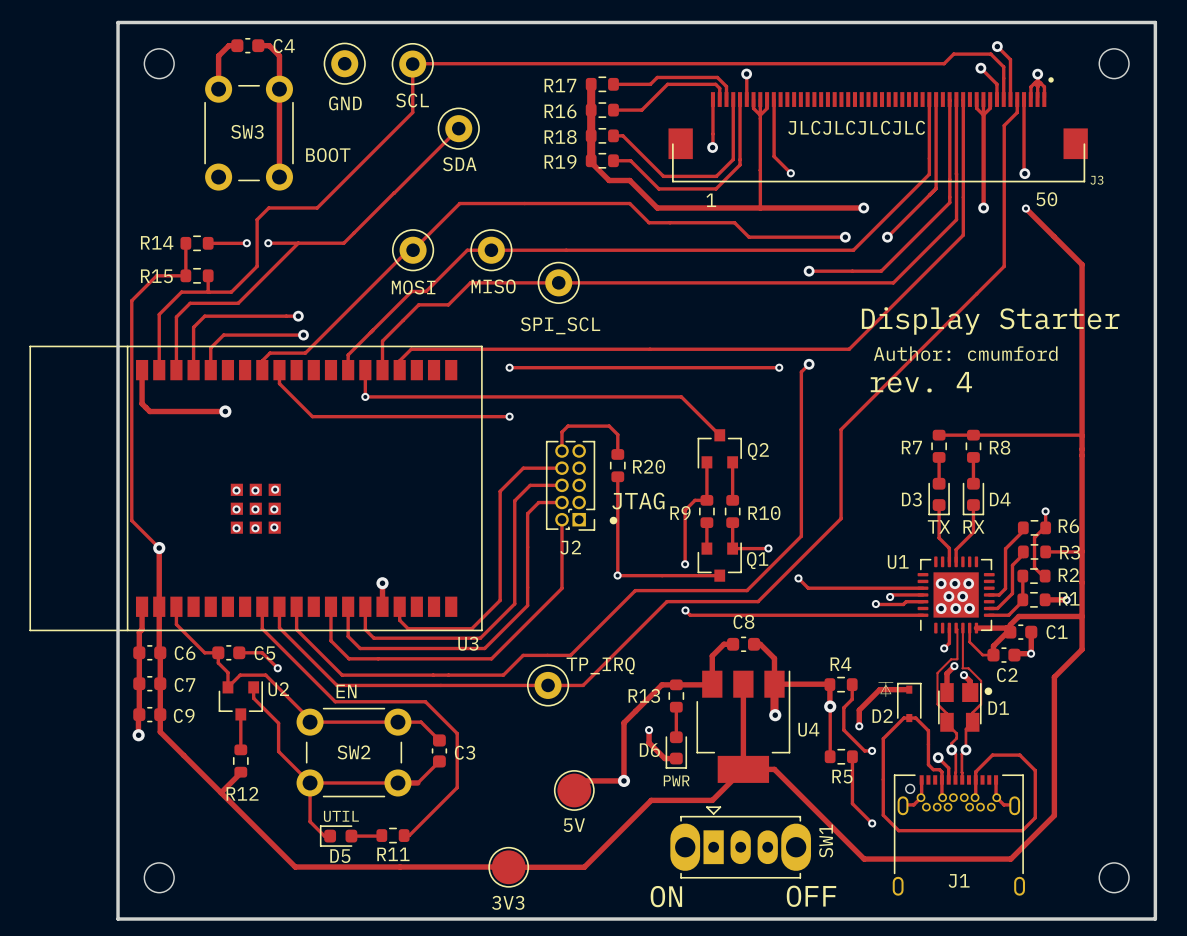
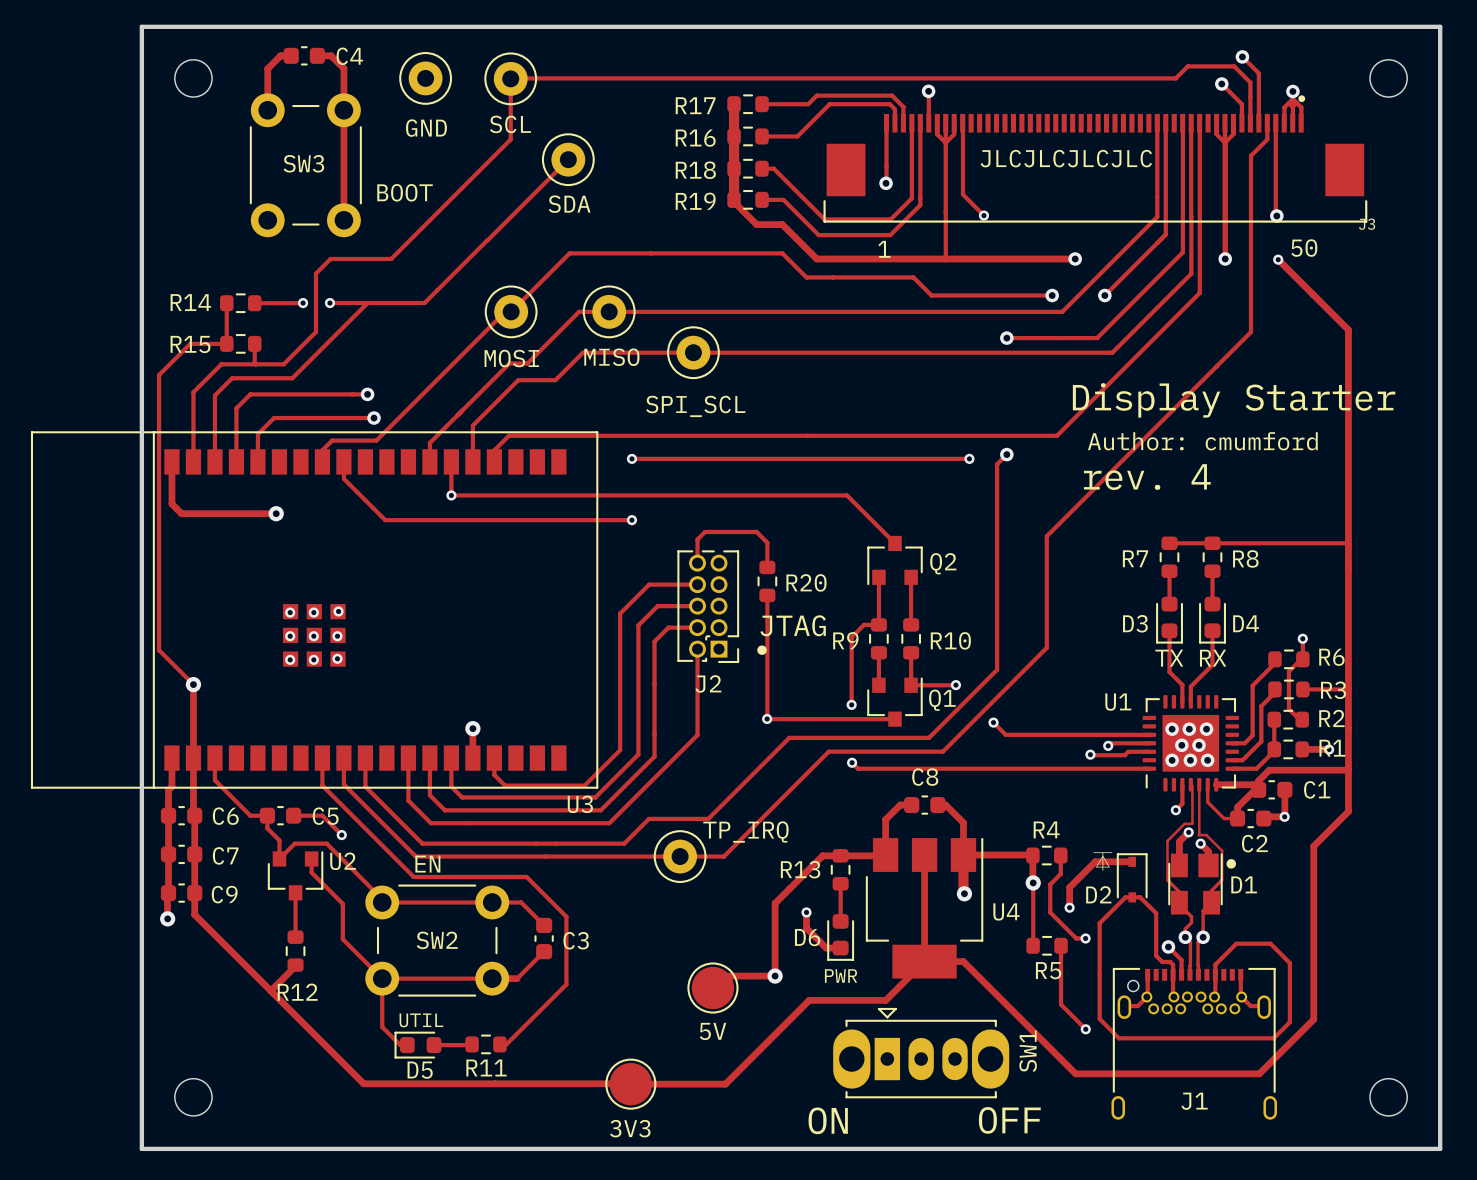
J3 footprint: [668, 77, 1088, 183] -> [823, 95, 1368, 223]

